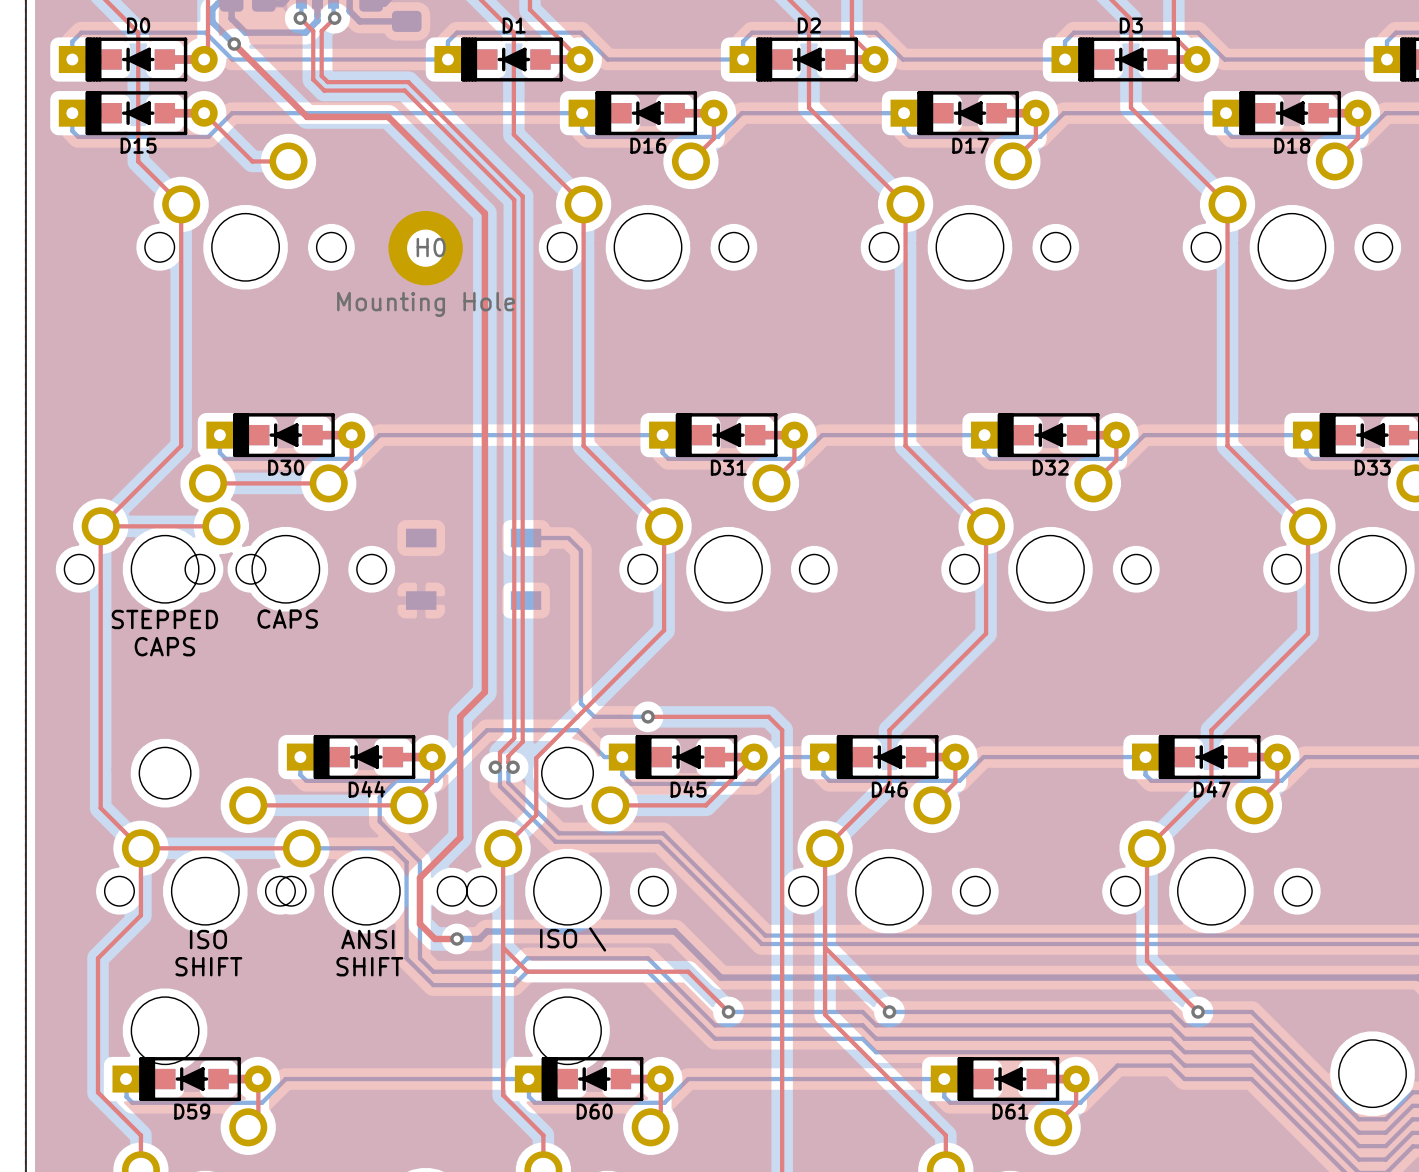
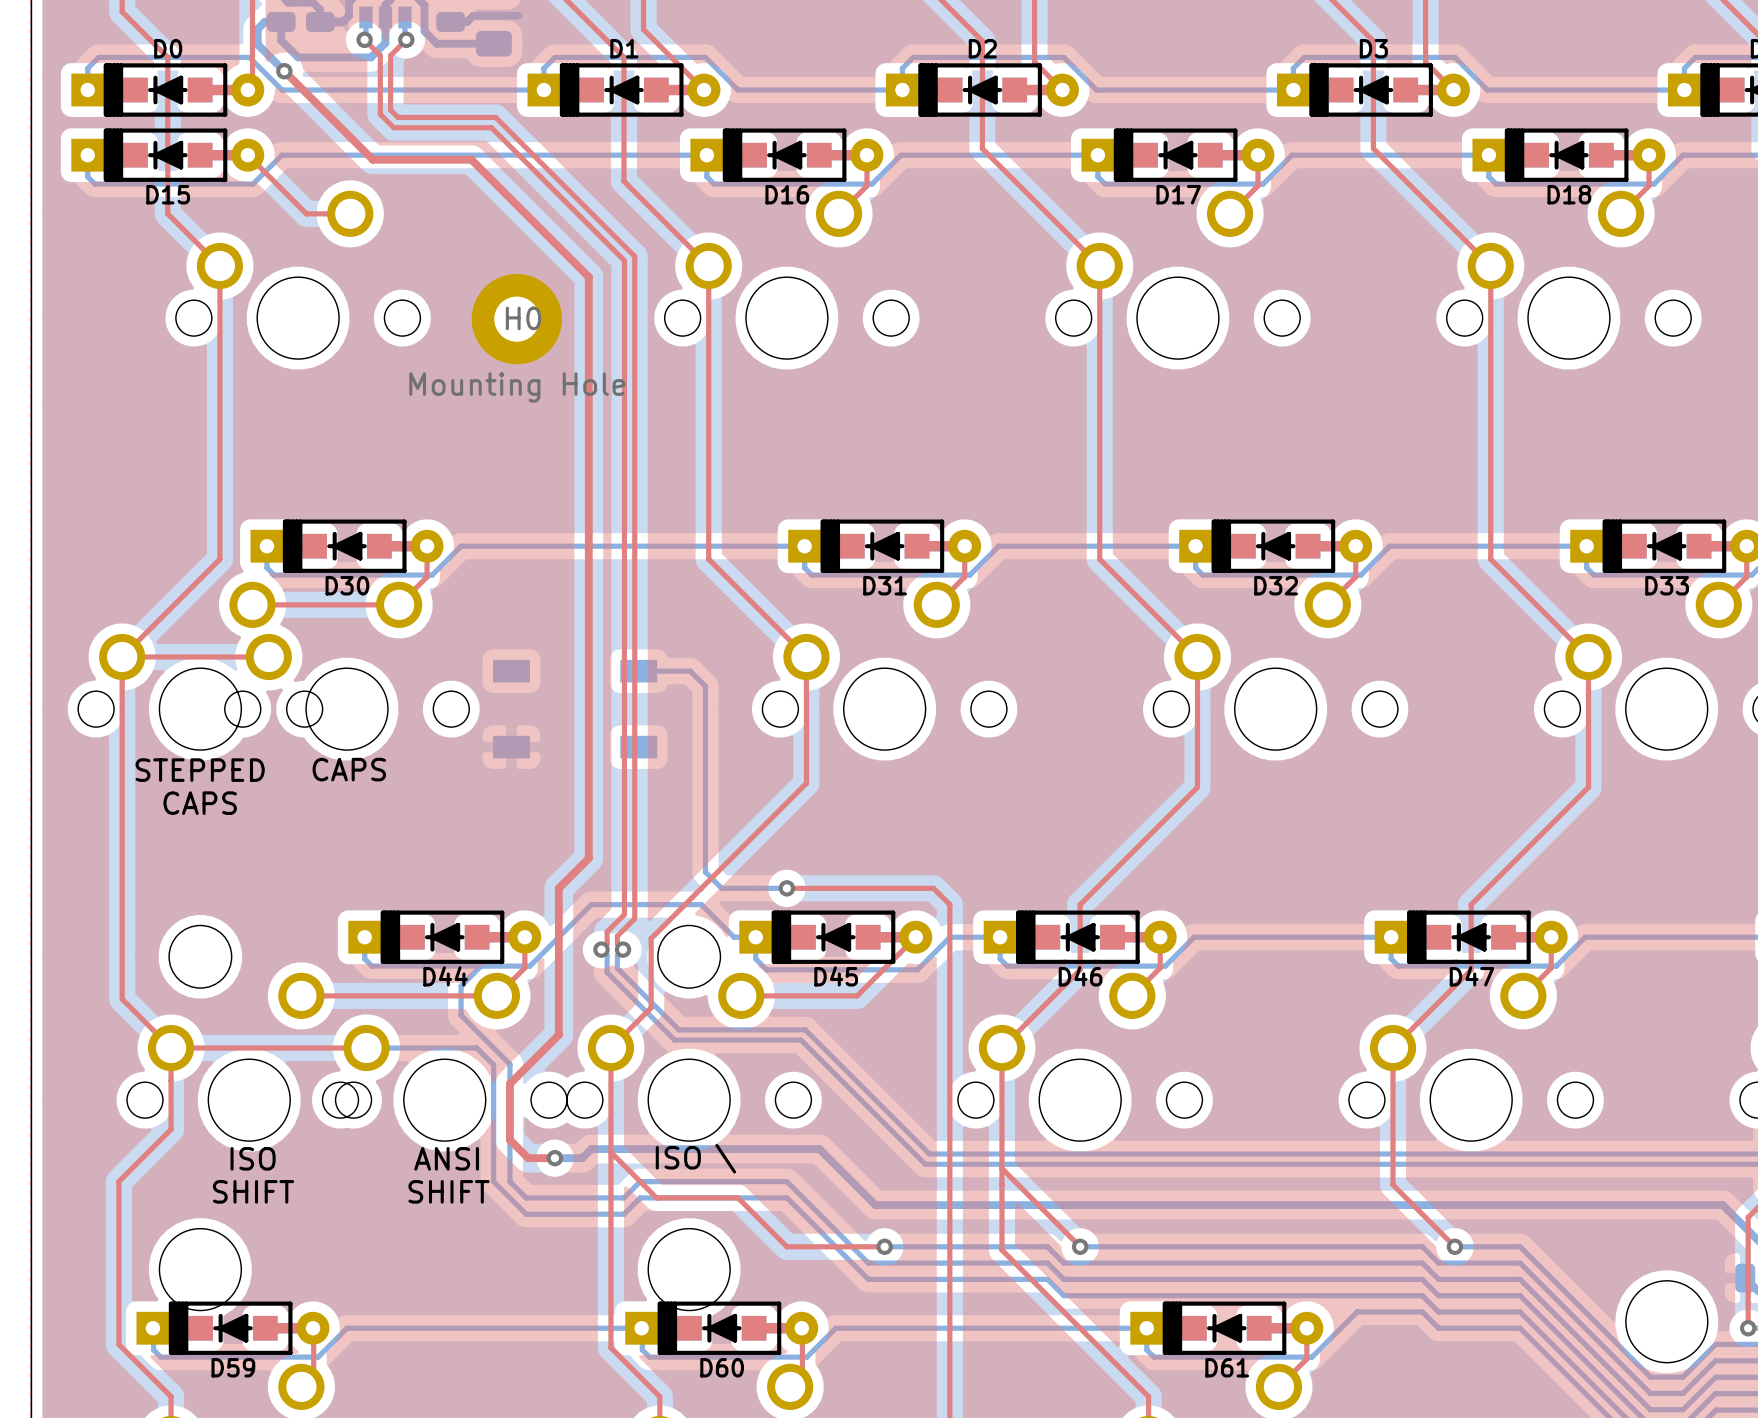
top track: (503, 947) (527, 971) (540, 971) -> (610, 1152) (656, 1197)
top track: (607, 971) (688, 971) (728, 1011) -> (738, 1197) (786, 1246) (884, 1246)

